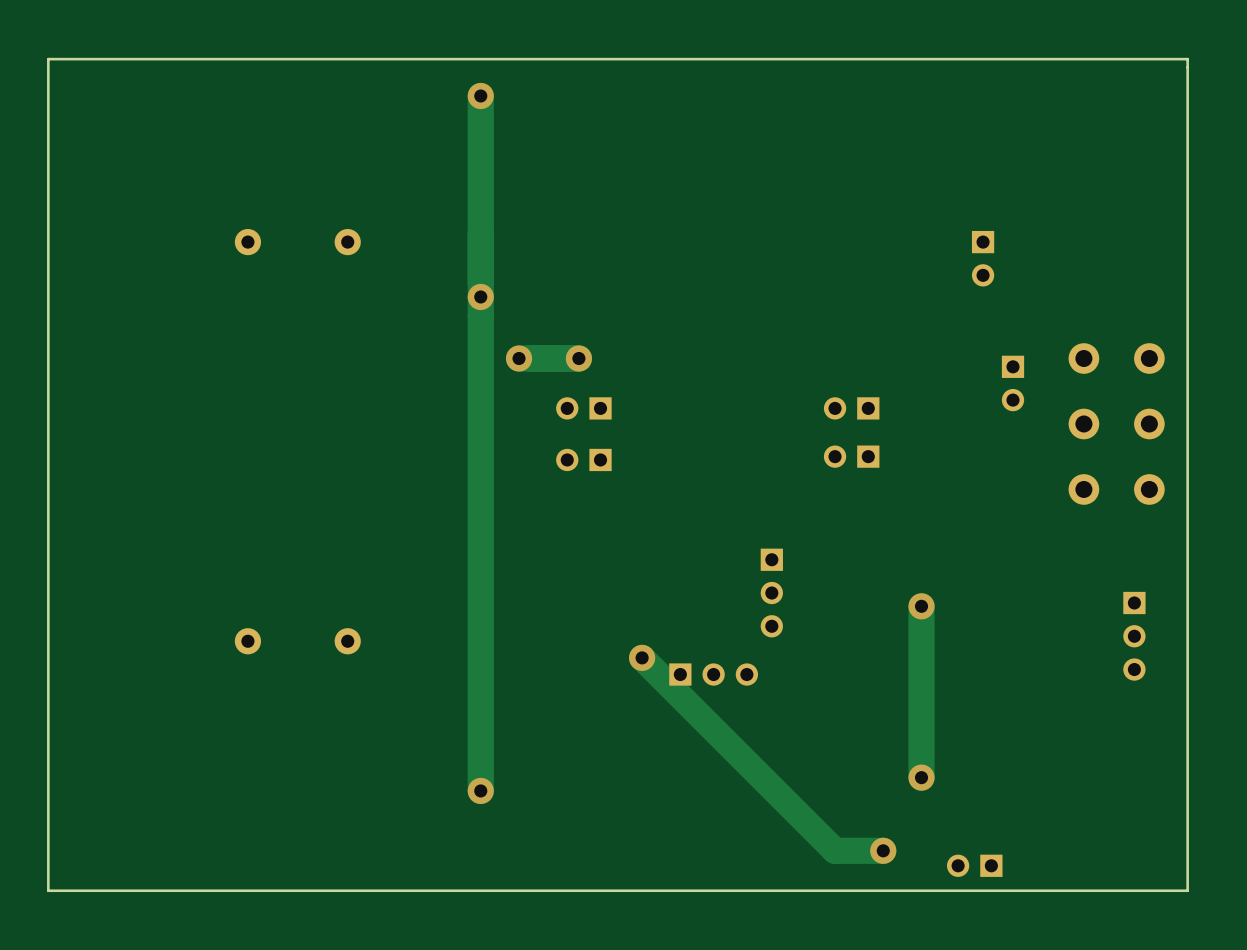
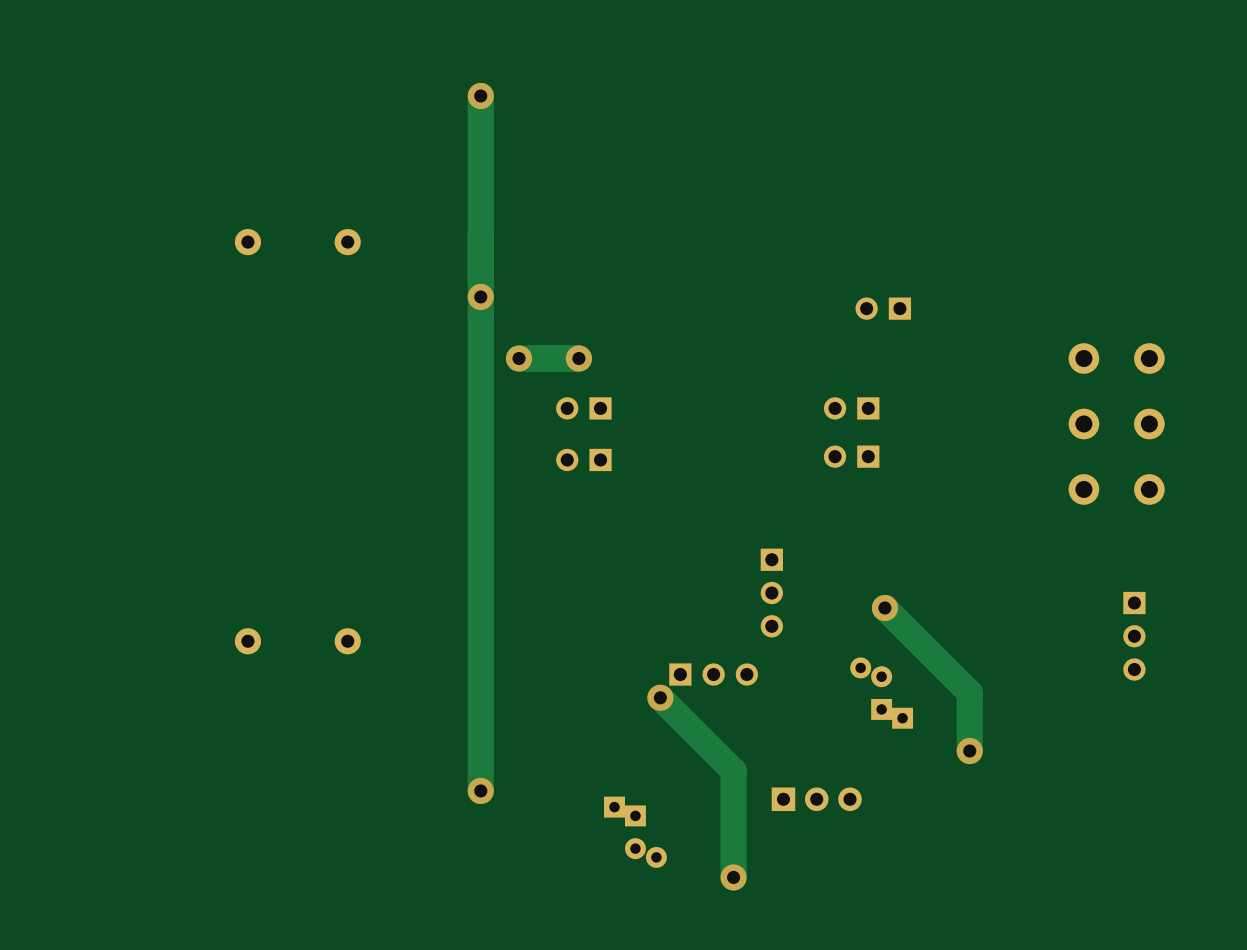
board edge: (1187, 59) (48, 59) (48, 890) (1187, 890) (1187, 59) -> none
part: (983, 258) -> none
part: none -> (883, 308)
part: (1013, 383) -> none
track: (921, 606) (921, 777) -> none
via position: (921, 606) -> (884, 607)
track: none -> (884, 607) (969, 692) (969, 751)
track: (642, 657) (835, 850) (883, 850) -> none
via position: (642, 657) -> (660, 697)
part: none -> (881, 693)
track: none -> (660, 697) (733, 770) (733, 877)
via position: (921, 777) -> (969, 751)
part: none -> (816, 799)
part: none -> (635, 832)
via: (883, 850) -> none
part: (974, 865) -> none
via: none -> (733, 877)

